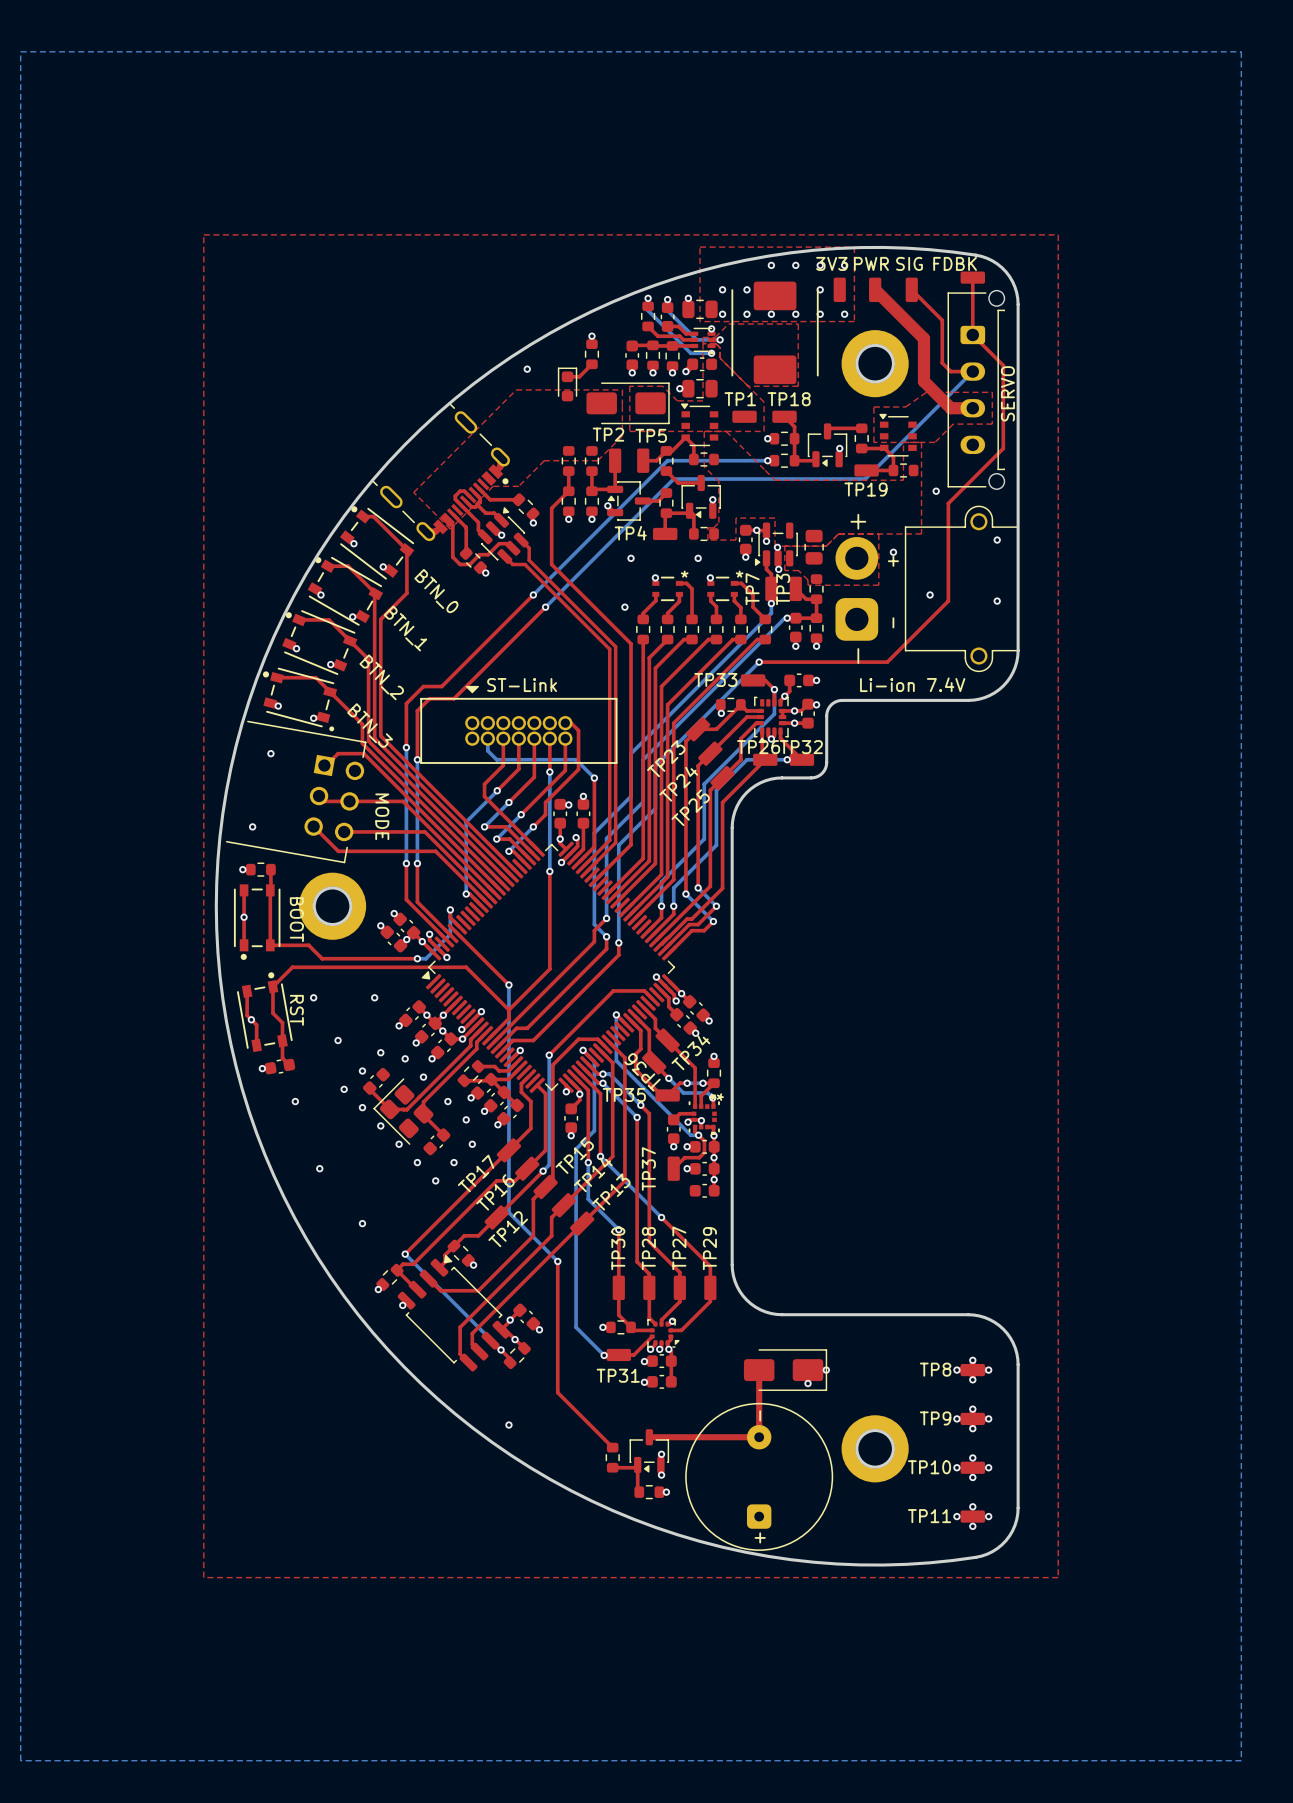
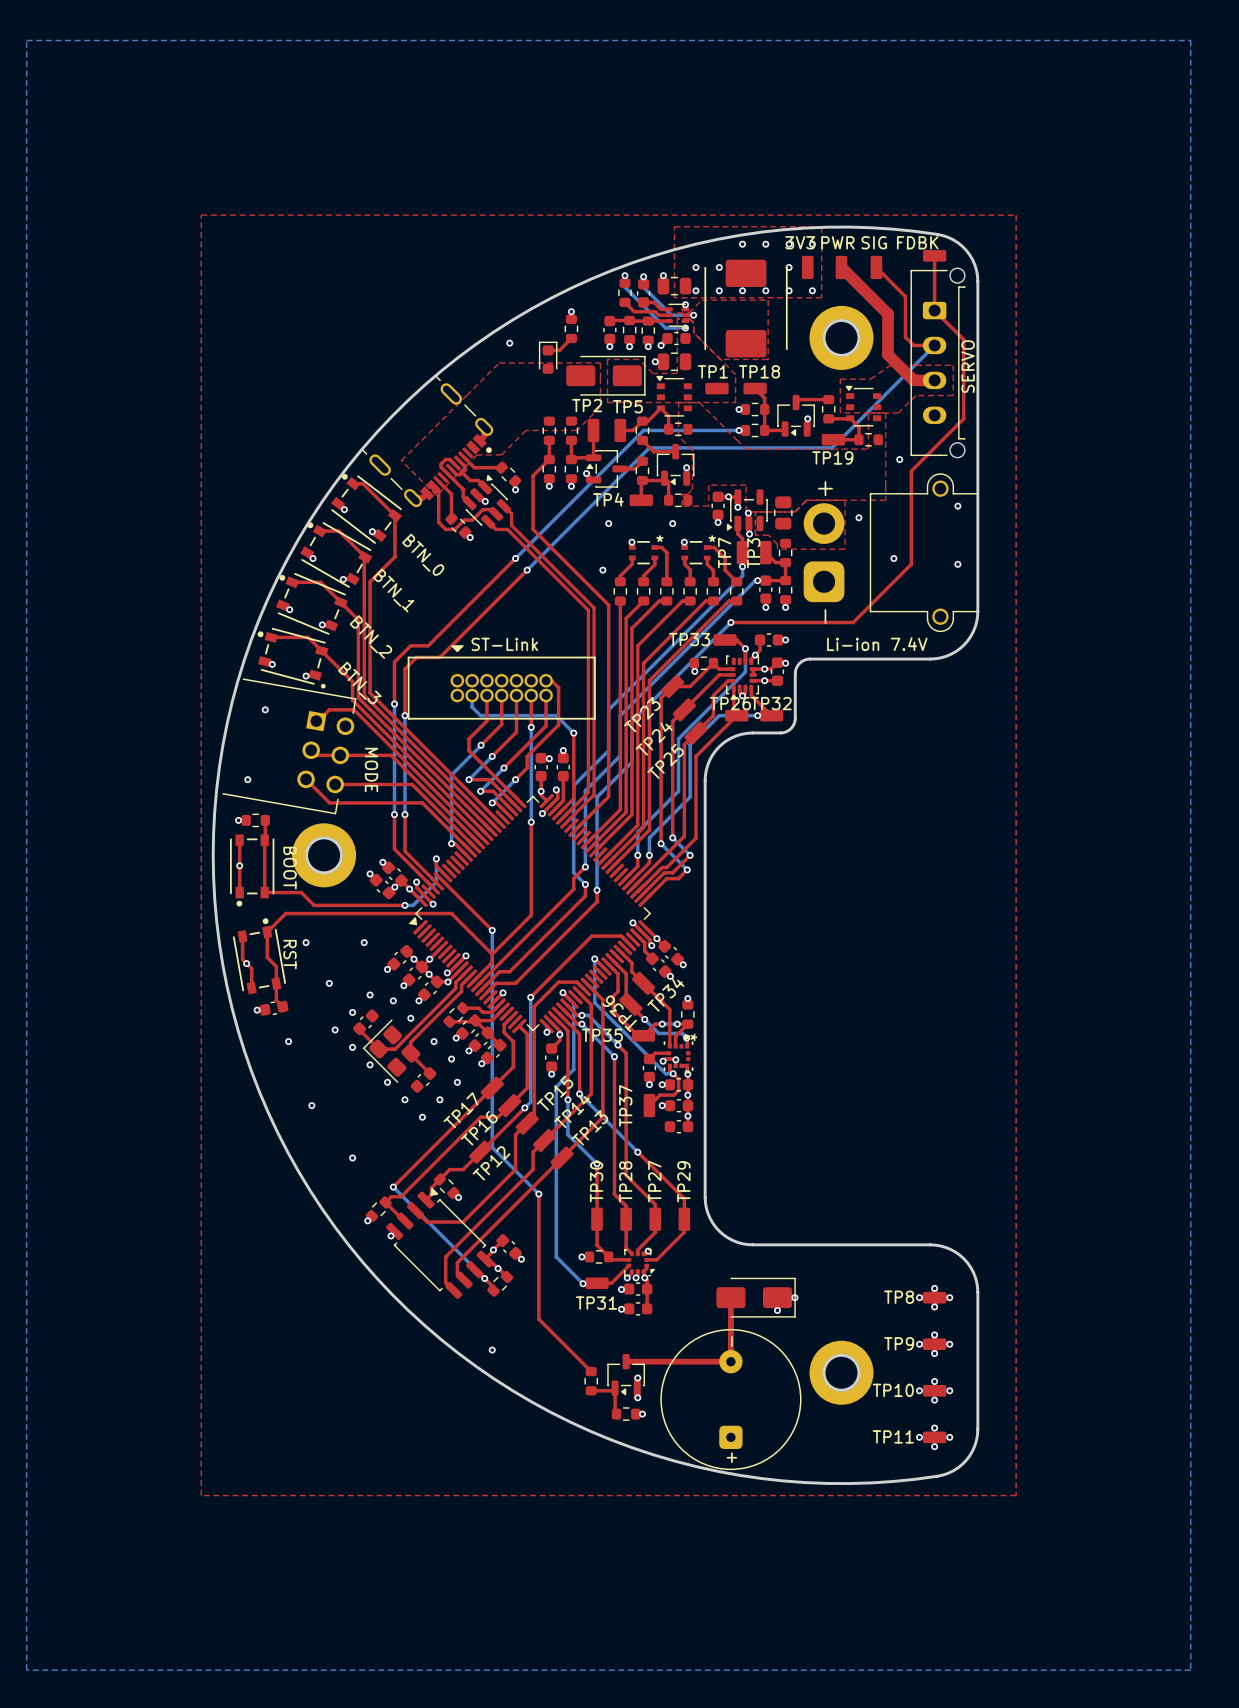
text: - + (893, 592) -> none

